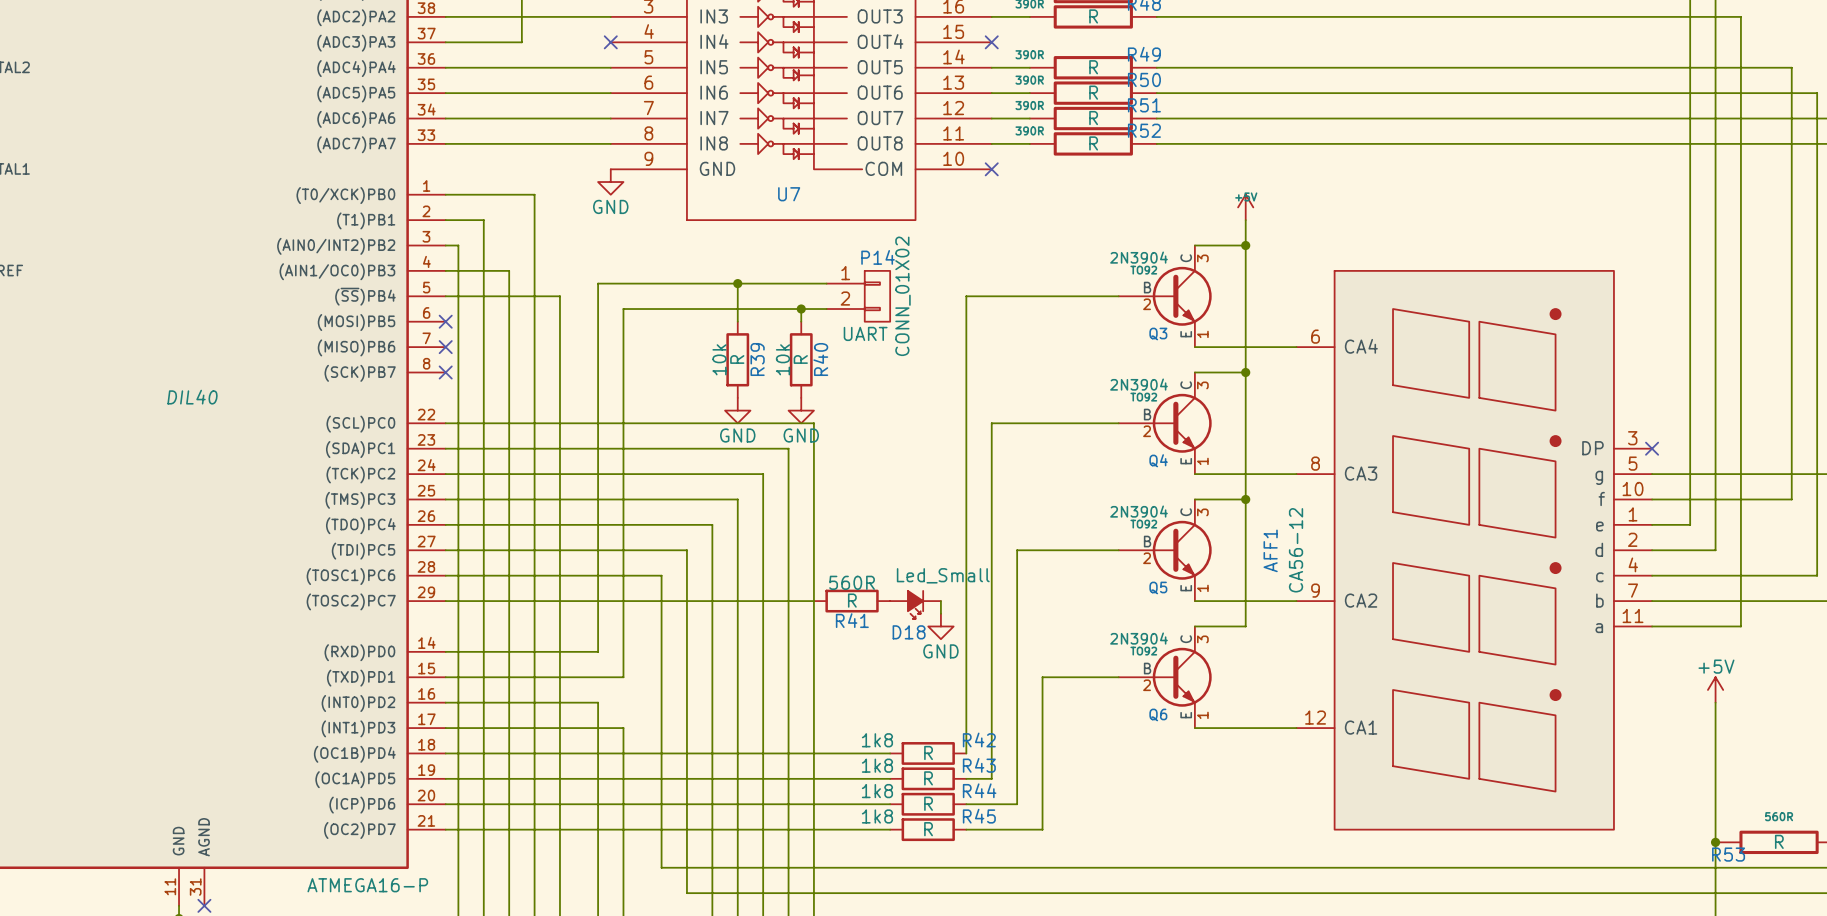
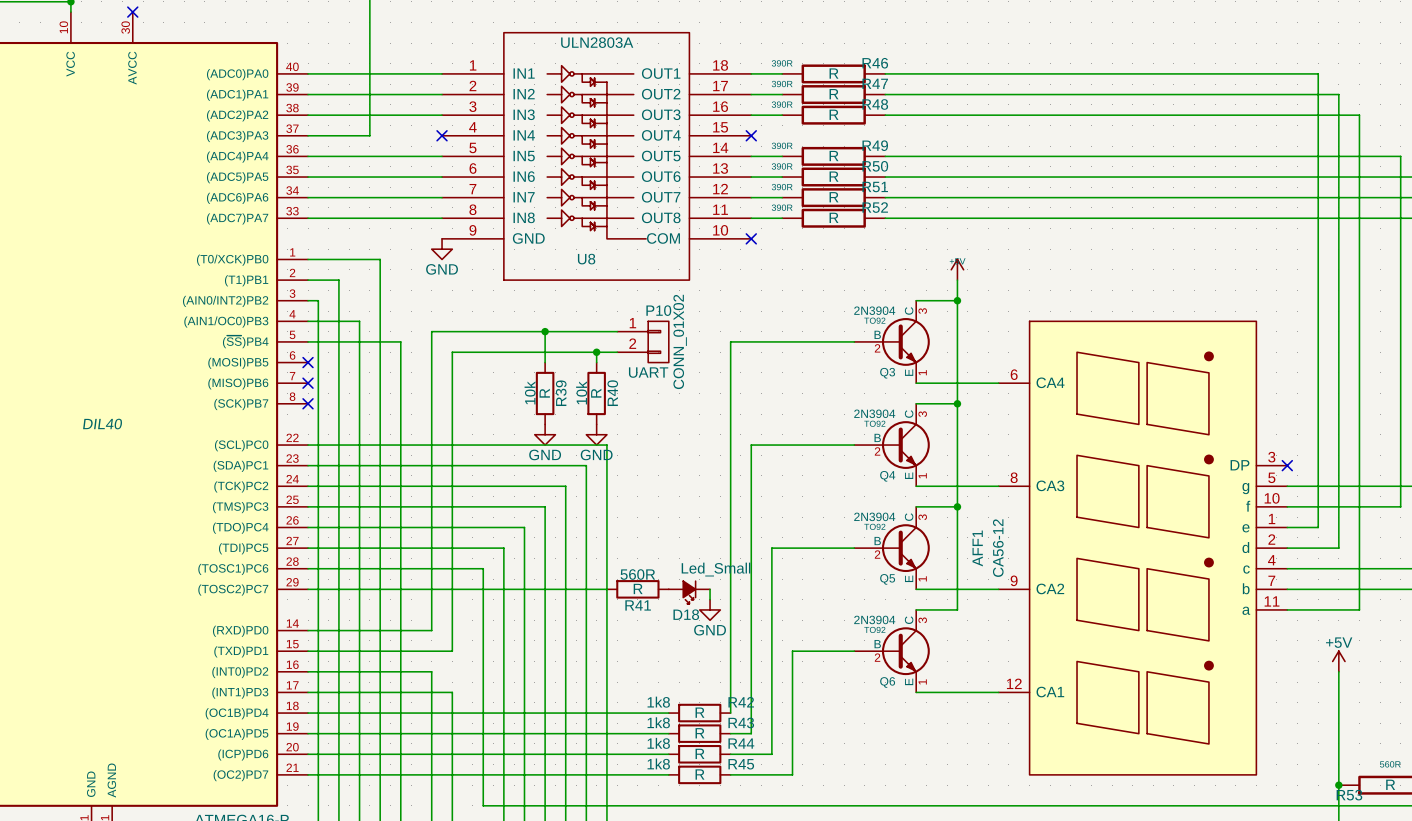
U7 name: U7 (789, 194) -> U8 (586, 259)
P14 name: P14 (878, 257) -> P10 (658, 310)

